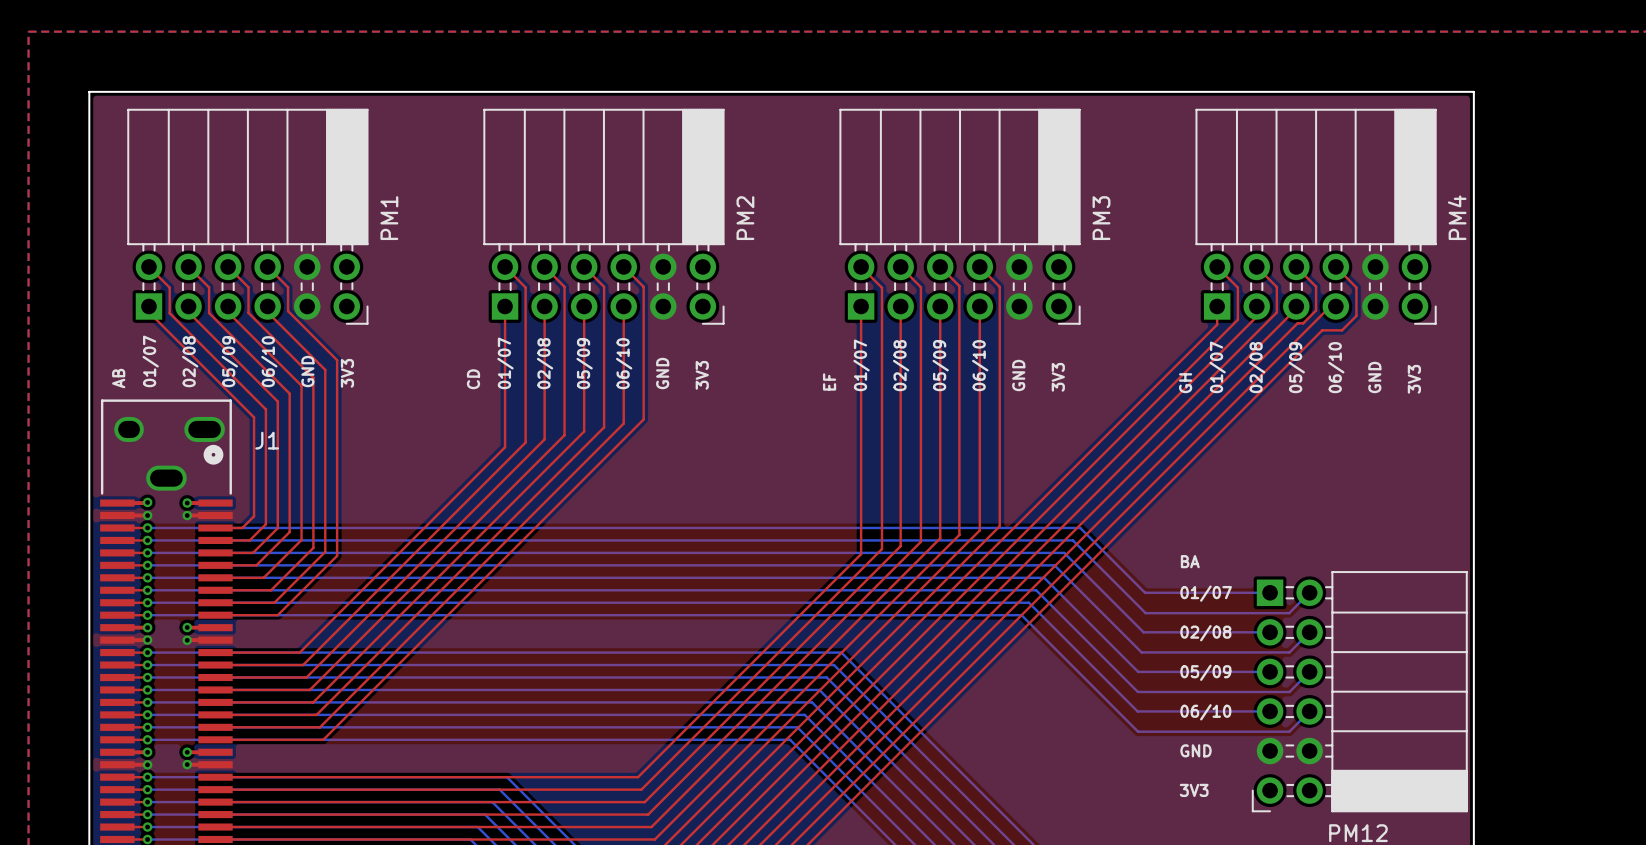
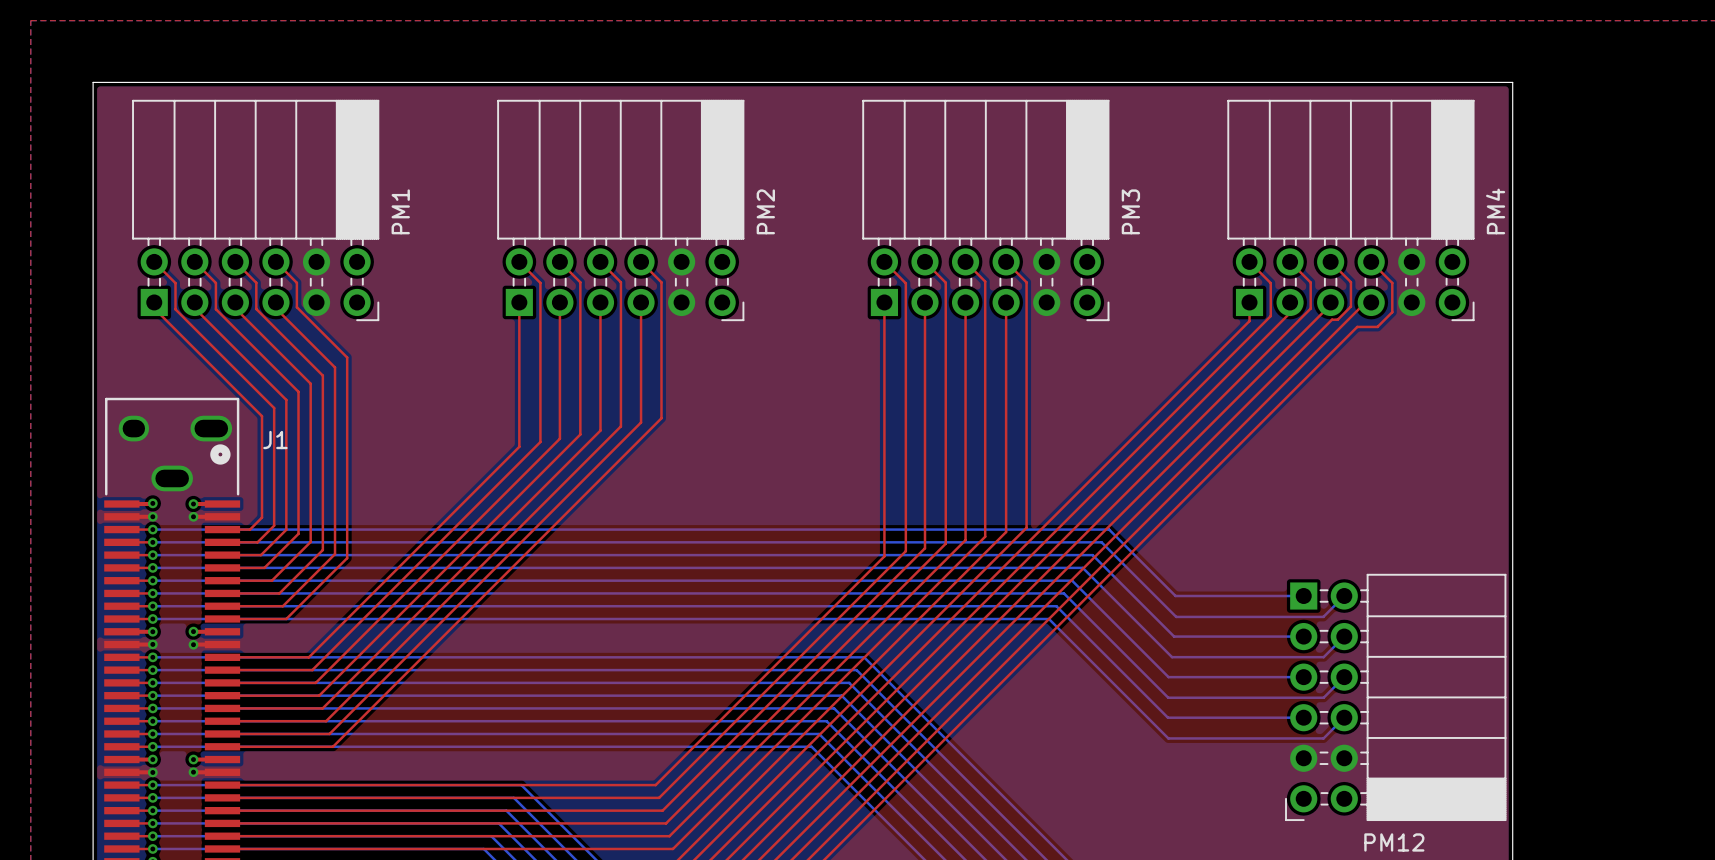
text: 01/07 (150, 361) -> none
text: 02/08 (190, 361) -> none
text: 05/09 (229, 361) -> none
text: 06/10 (269, 361) -> none
text: 01/07 (505, 363) -> none
text: 02/08 (545, 363) -> none
text: 05/09 (584, 363) -> none
text: 06/10 (624, 363) -> none
text: 01/07 (861, 365) -> none
text: 02/08 (901, 365) -> none
text: 05/09 (940, 365) -> none
text: 06/10 (980, 365) -> none
text: 01/07 (1217, 367) -> none
text: 02/08 (1257, 367) -> none
text: 05/09 (1296, 367) -> none
text: 06/10 (1336, 367) -> none
text: GND (307, 371) -> none
text: 3V3 (347, 373) -> none
text: GND (662, 373) -> none
text: 3V3 (702, 375) -> none
text: GND (1018, 375) -> none
text: 3V3 (1058, 377) -> none
text: GND (1374, 377) -> none
text: AB (118, 378) -> none
text: CD (473, 379) -> none
text: 3V3 (1414, 379) -> none
text: EF (829, 381) -> none
text: GH (1185, 383) -> none
text: BA (1190, 561) -> none
text: 01/07 (1206, 593) -> none
text: 02/08 (1205, 633) -> none
text: 05/09 (1205, 672) -> none
text: 06/10 (1205, 712) -> none
text: GND (1196, 750) -> none
text: 3V3 (1194, 790) -> none

